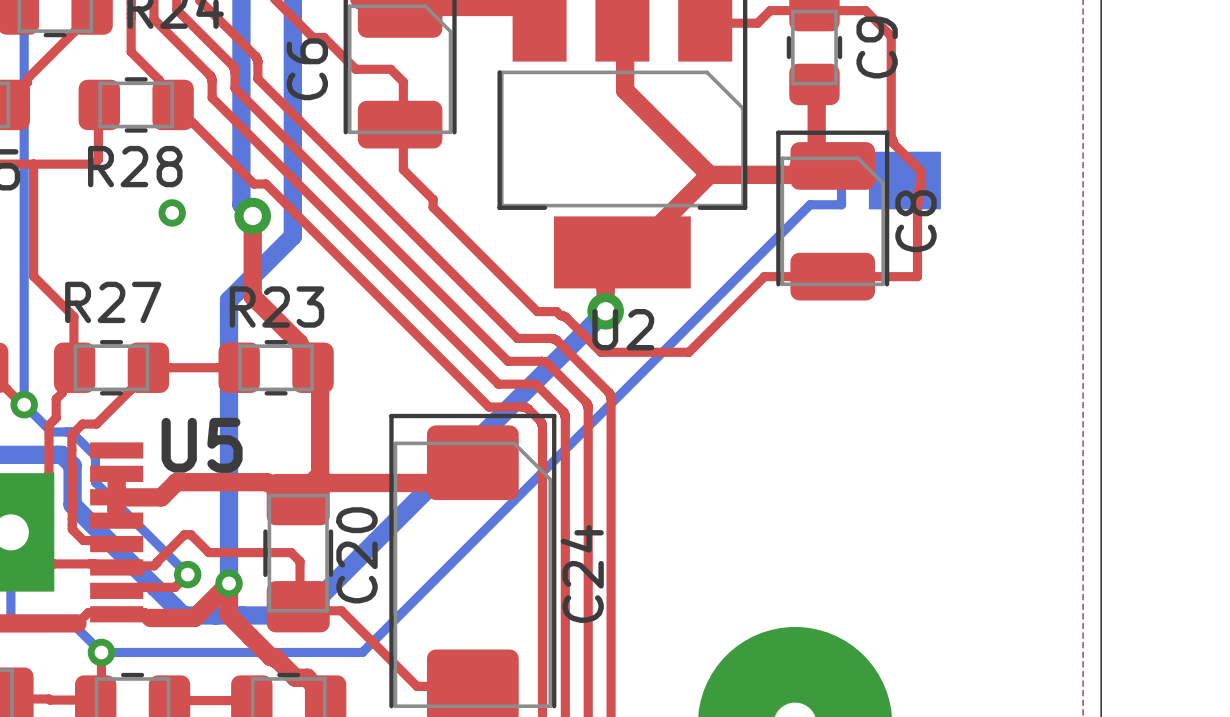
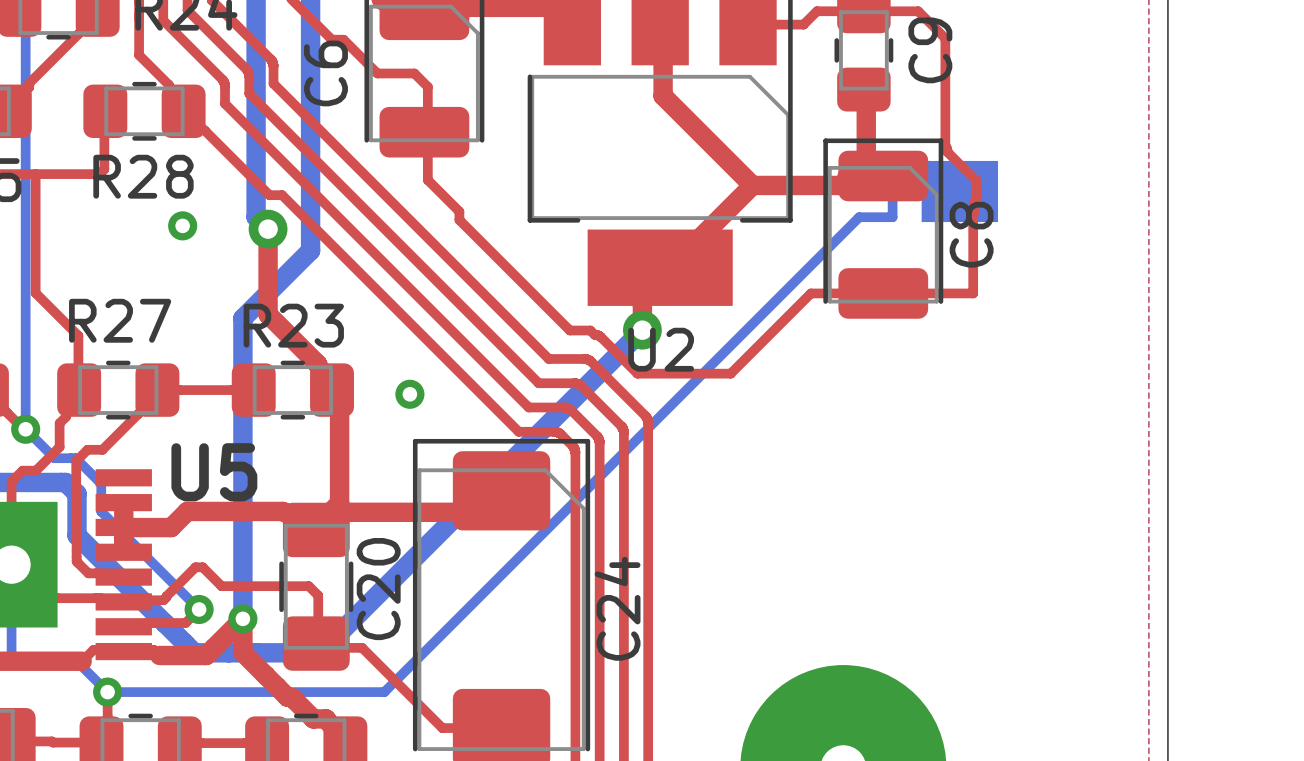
via: none -> (409, 394)
top track: (56, 417) (48, 425) (48, 477) (10, 532) -> (59, 443) (59, 447) (36, 470) (22, 470) (11, 481) (11, 564)

